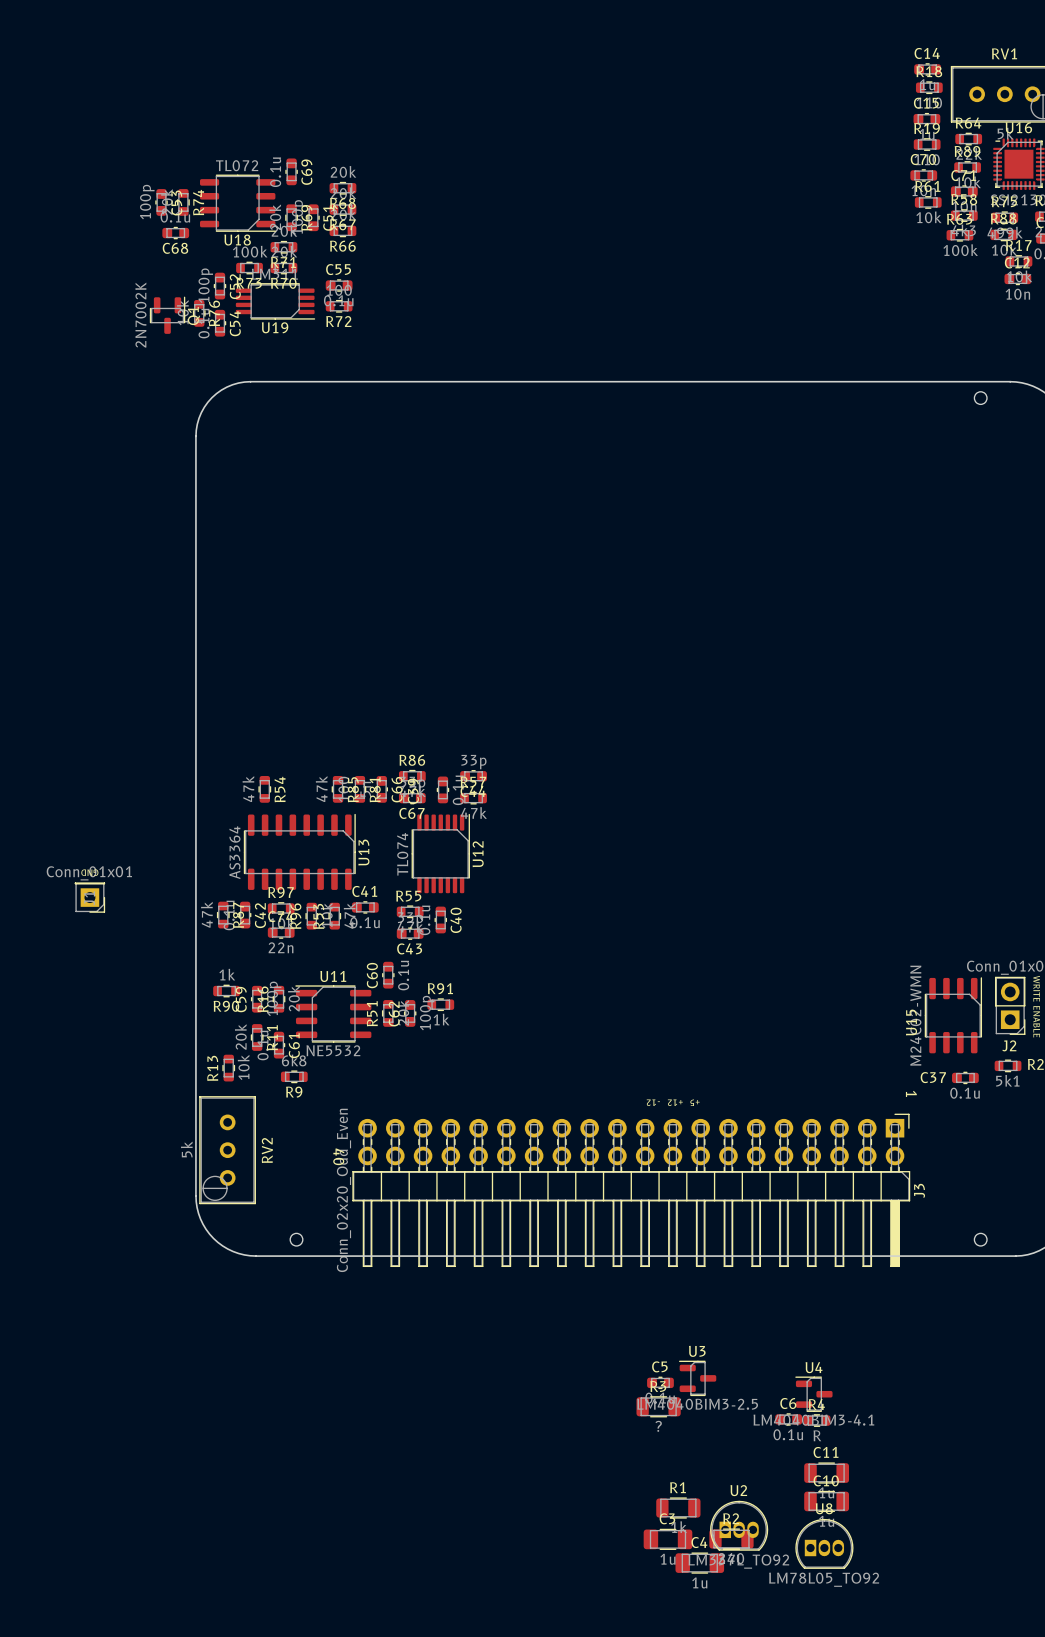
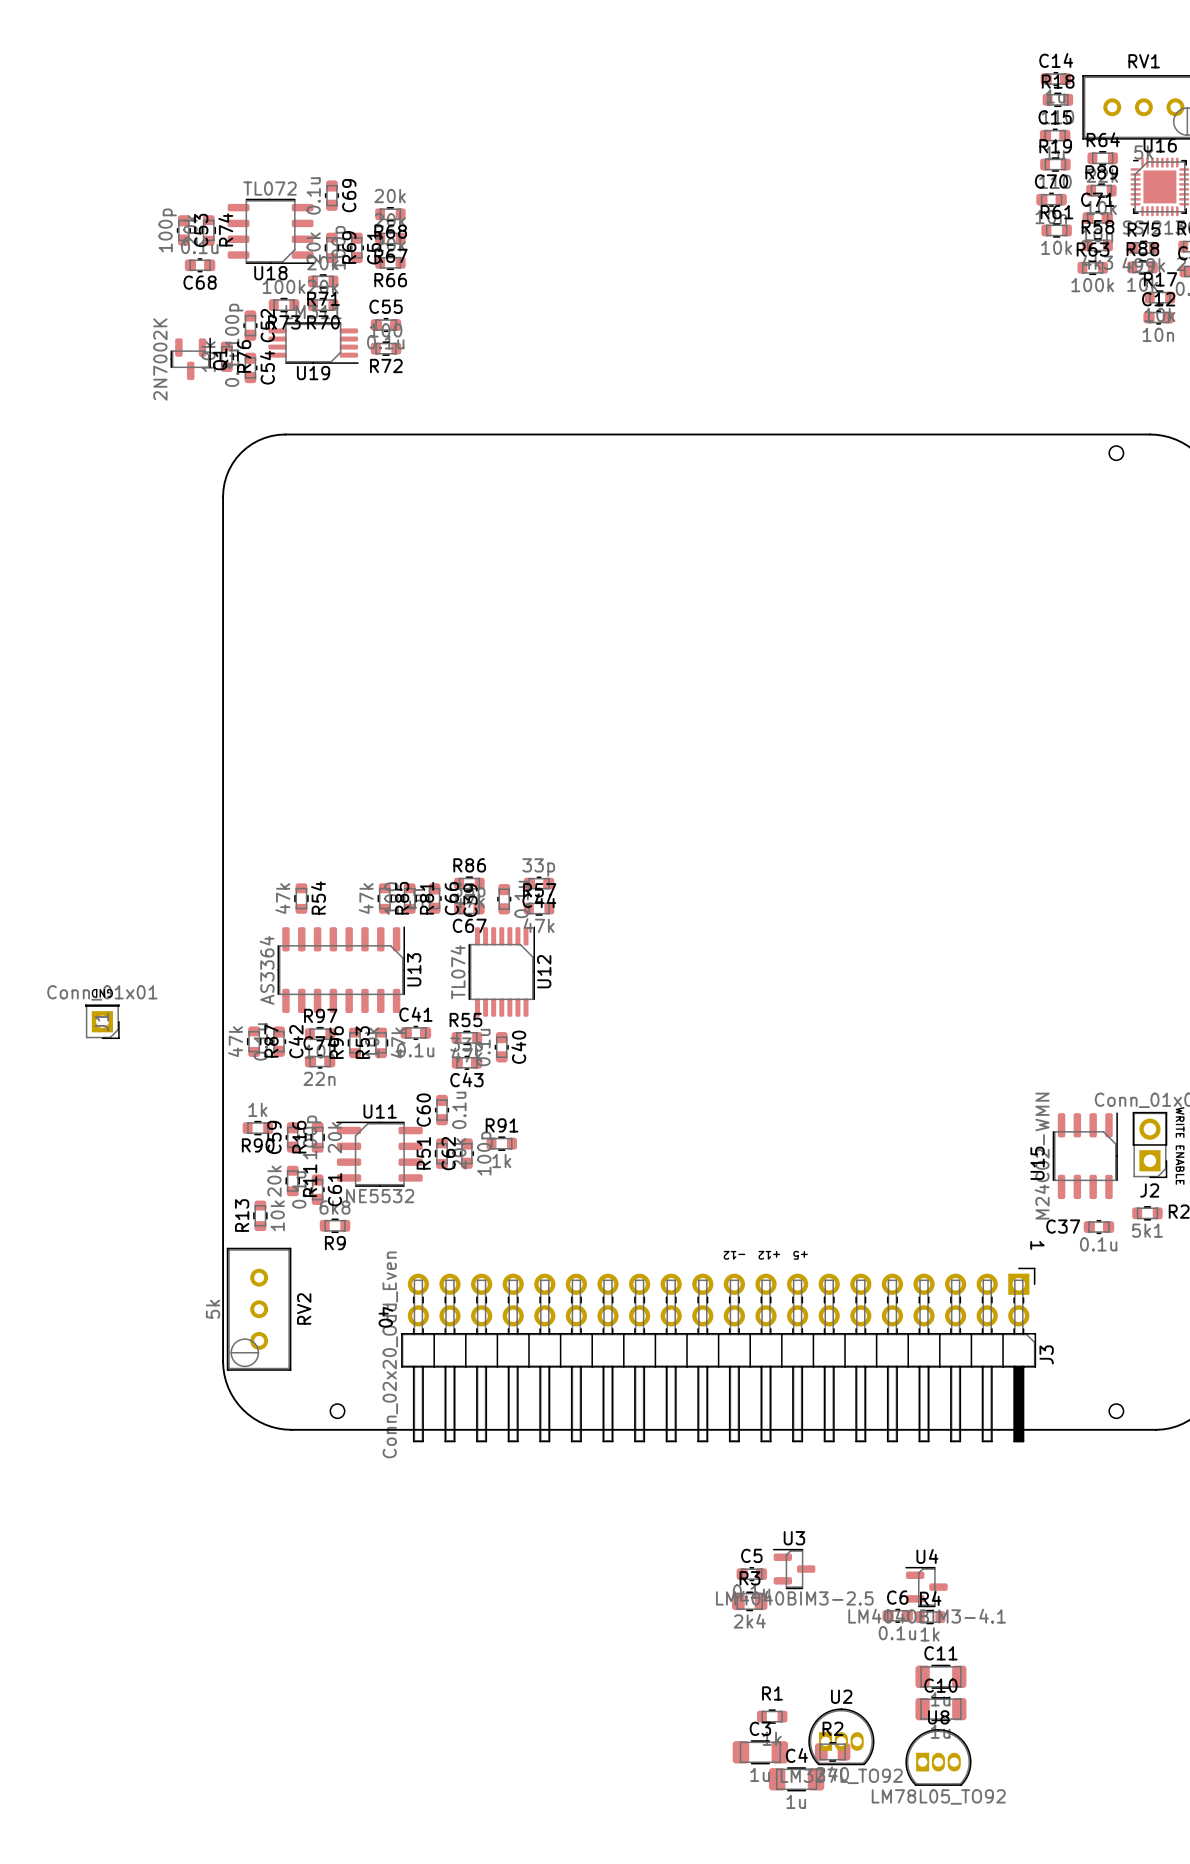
R3 footprint: [636, 1396, 681, 1418] -> [731, 1591, 768, 1612]
R3 value: ? (658, 1426) -> 2k4 (749, 1621)
R4 value: R (817, 1435) -> 1k (930, 1634)
R1 footprint: [656, 1497, 701, 1519] -> [756, 1709, 788, 1724]
R2 footprint: [709, 1528, 754, 1550] -> [814, 1742, 851, 1762]

